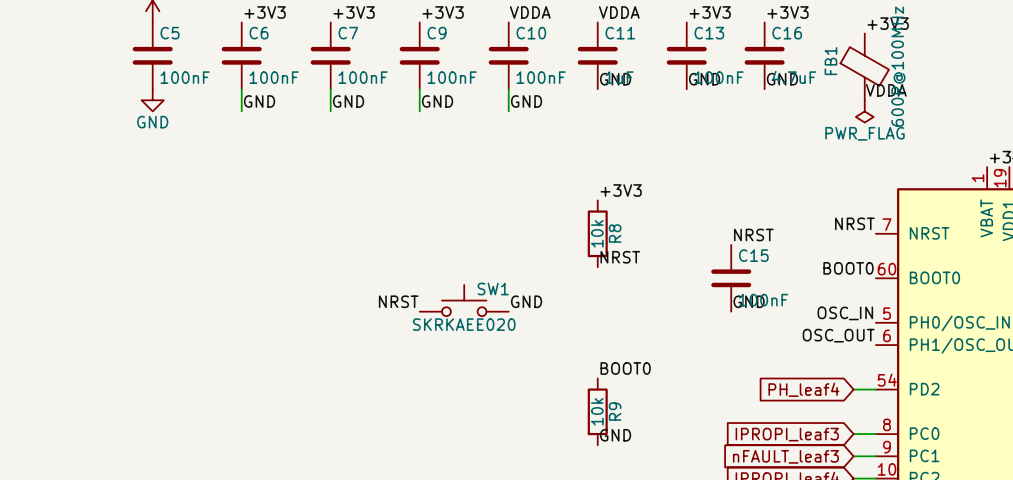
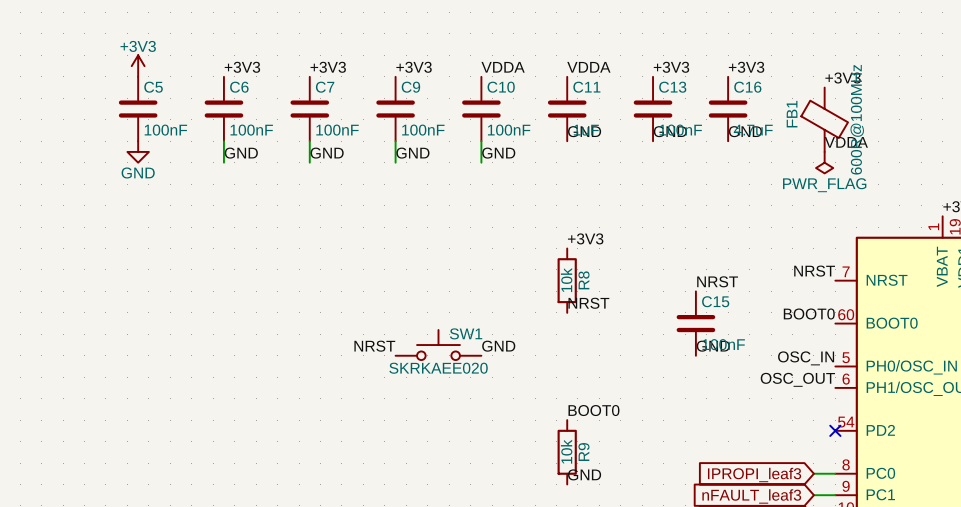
global label: PH_leaf4 (803, 389) -> none
wire: (853, 389) (875, 389) -> none
no-connect mark: none -> (835, 430)

